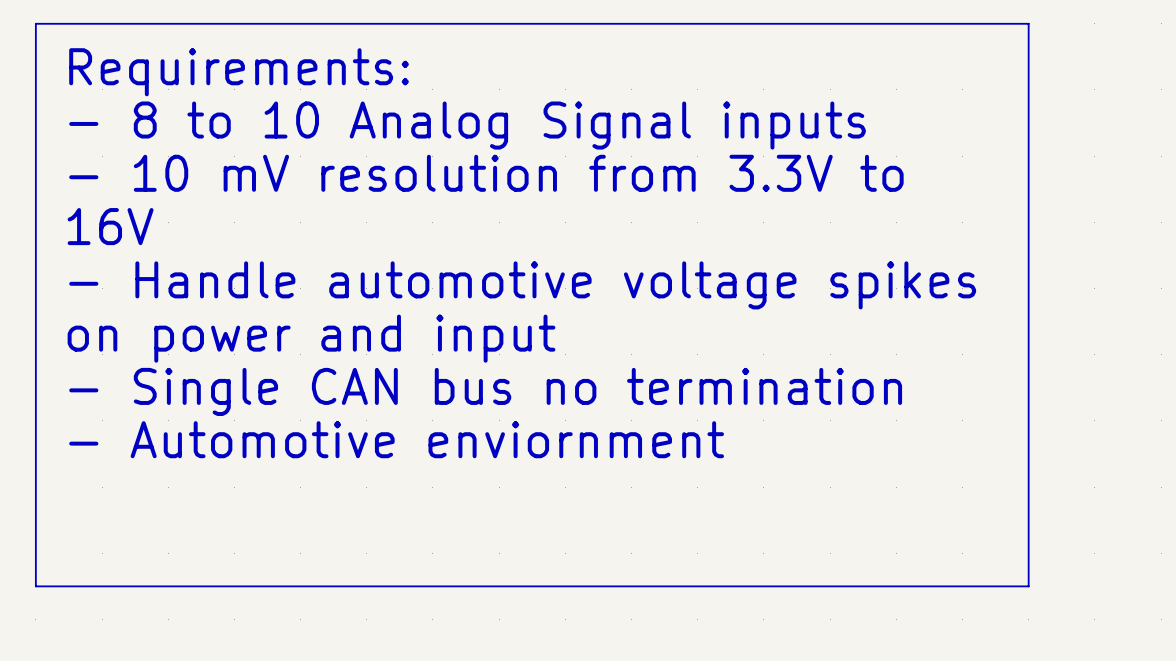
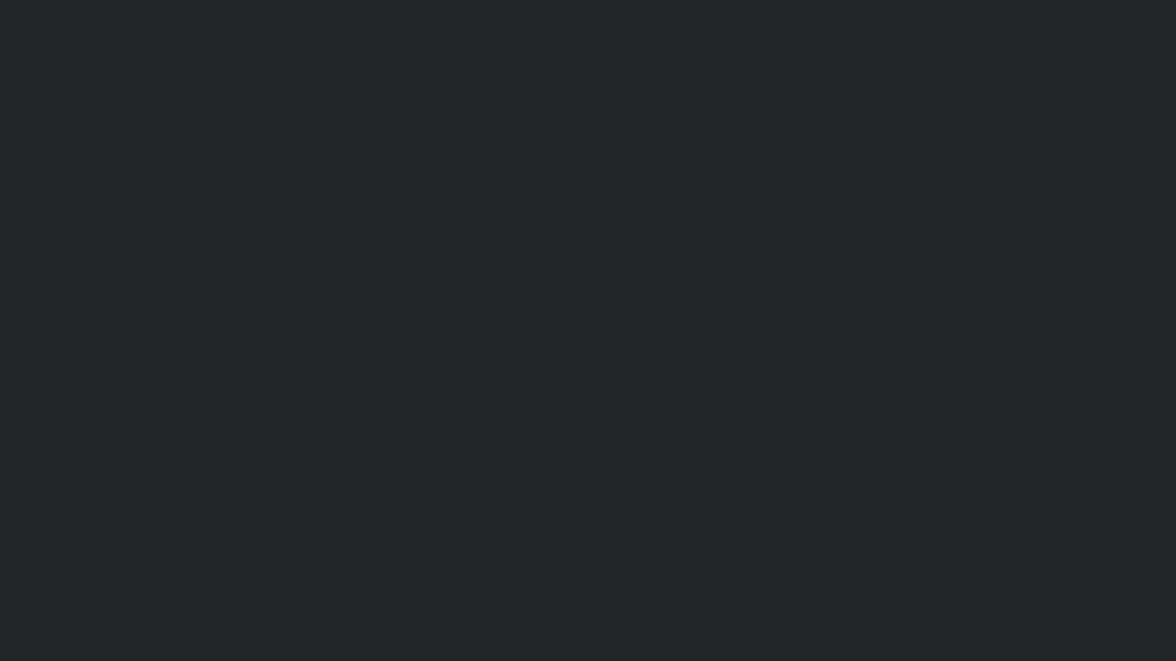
line: (35, 23) (1028, 23) (1028, 586) (35, 586) (35, 23) -> none
text: Requirements: (239, 72) -> none
text: - 8 to 10 Analog Signal inputs (467, 125) -> none
text: - 10 mV resolution from 3.3V to (486, 173) -> none
text: 16V (110, 226) -> none
text: - Handle automotive voltage spikes (522, 285) -> none
text: on power and input (311, 338) -> none
text: - Single CAN bus no termination (485, 391) -> none
text: - Automotive enviornment (396, 439) -> none

